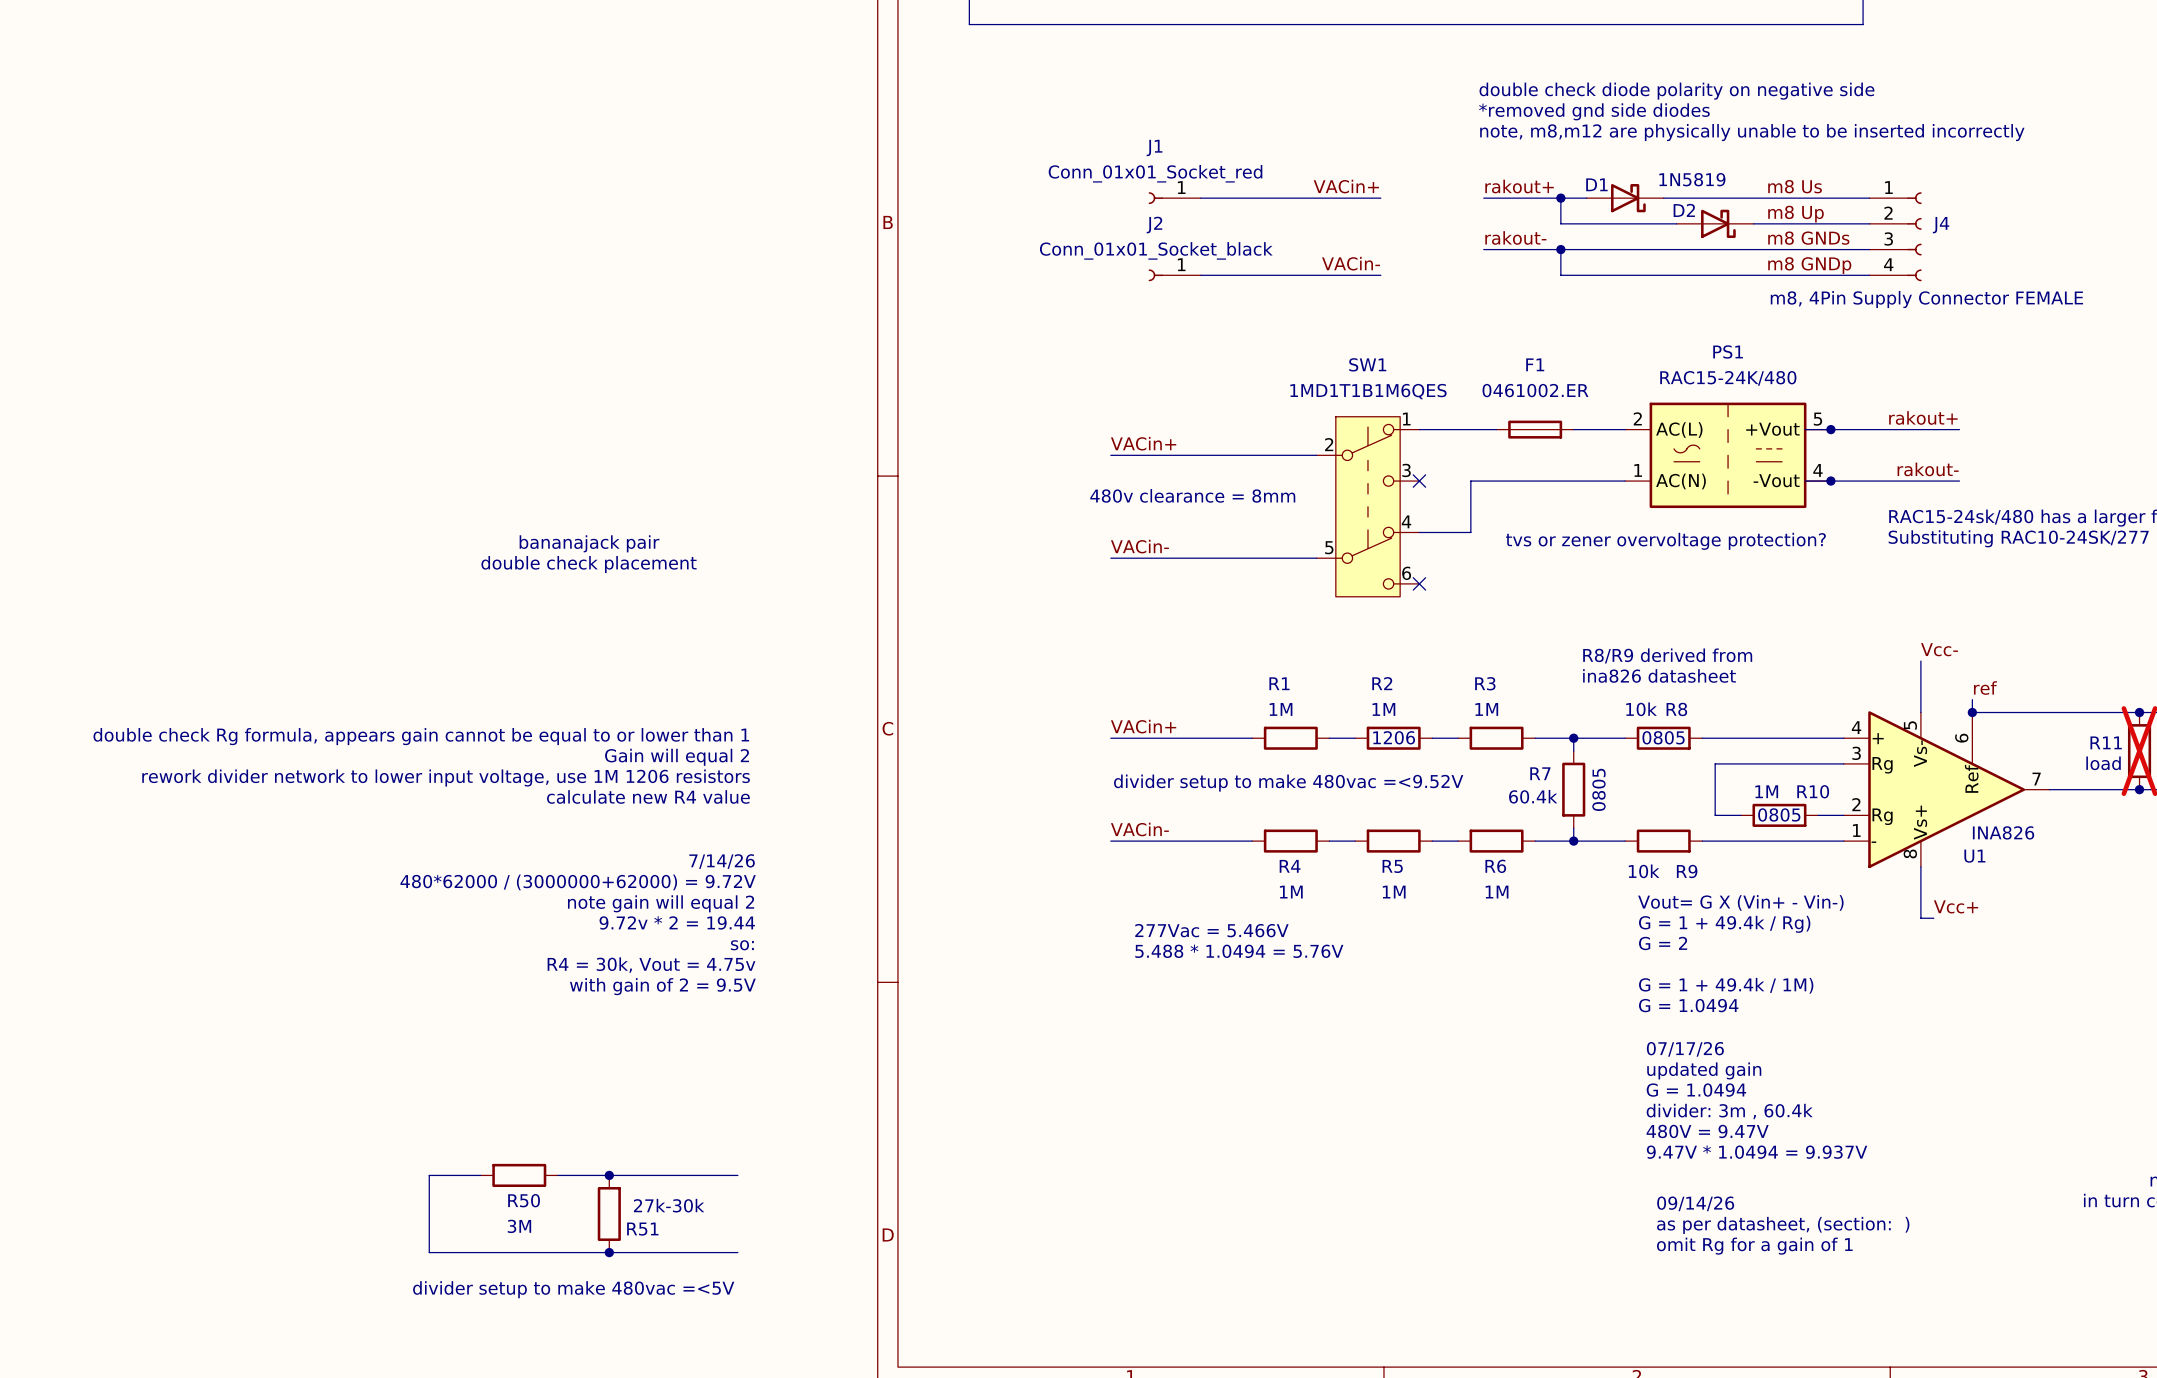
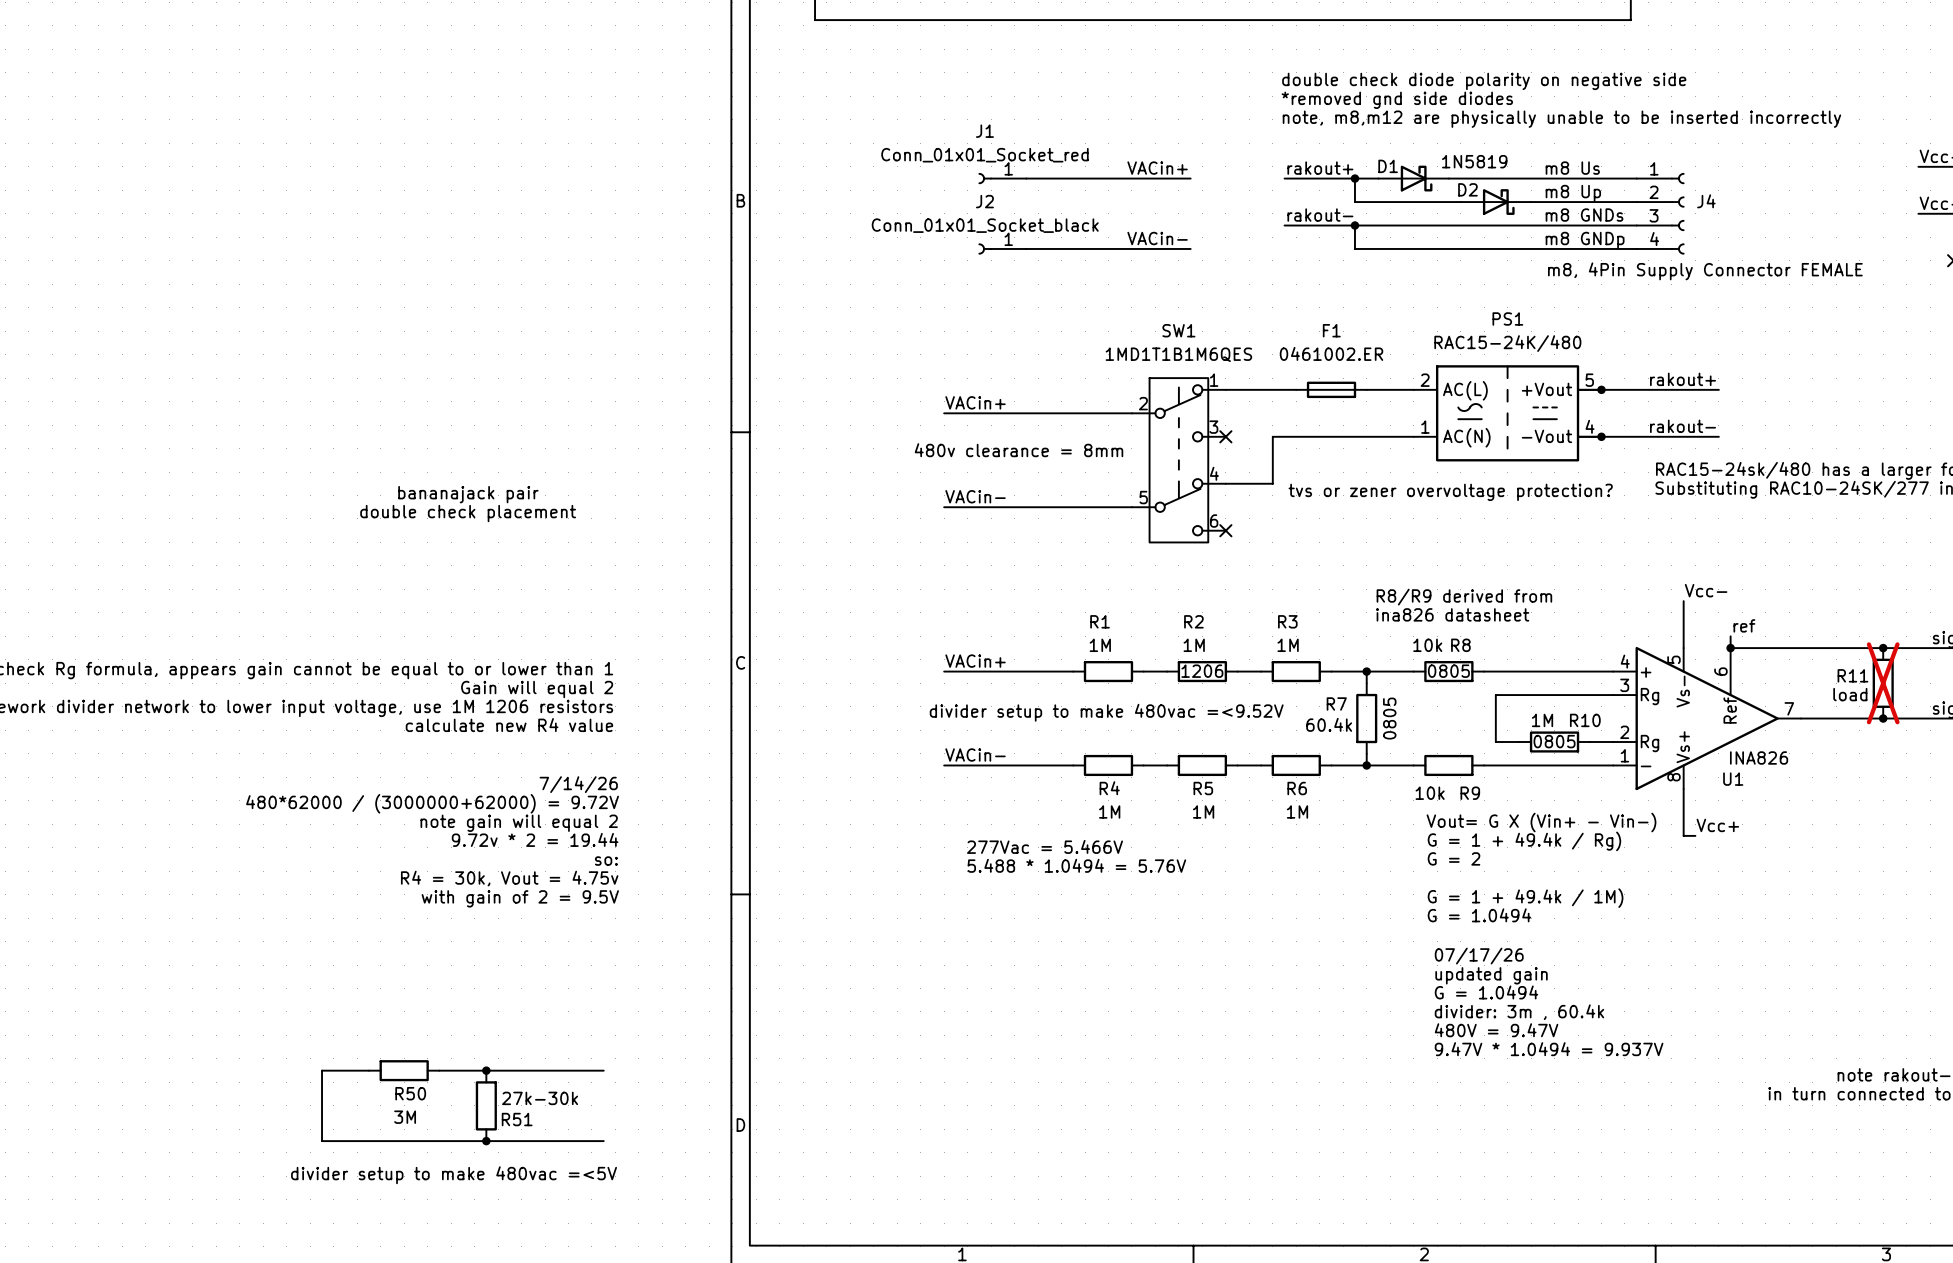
text: 09/14/26 (1695, 1203) -> none
text: as per datasheet, (section: ) (1783, 1225) -> none
text: omit Rg for a gain of 1 (1754, 1246) -> none

